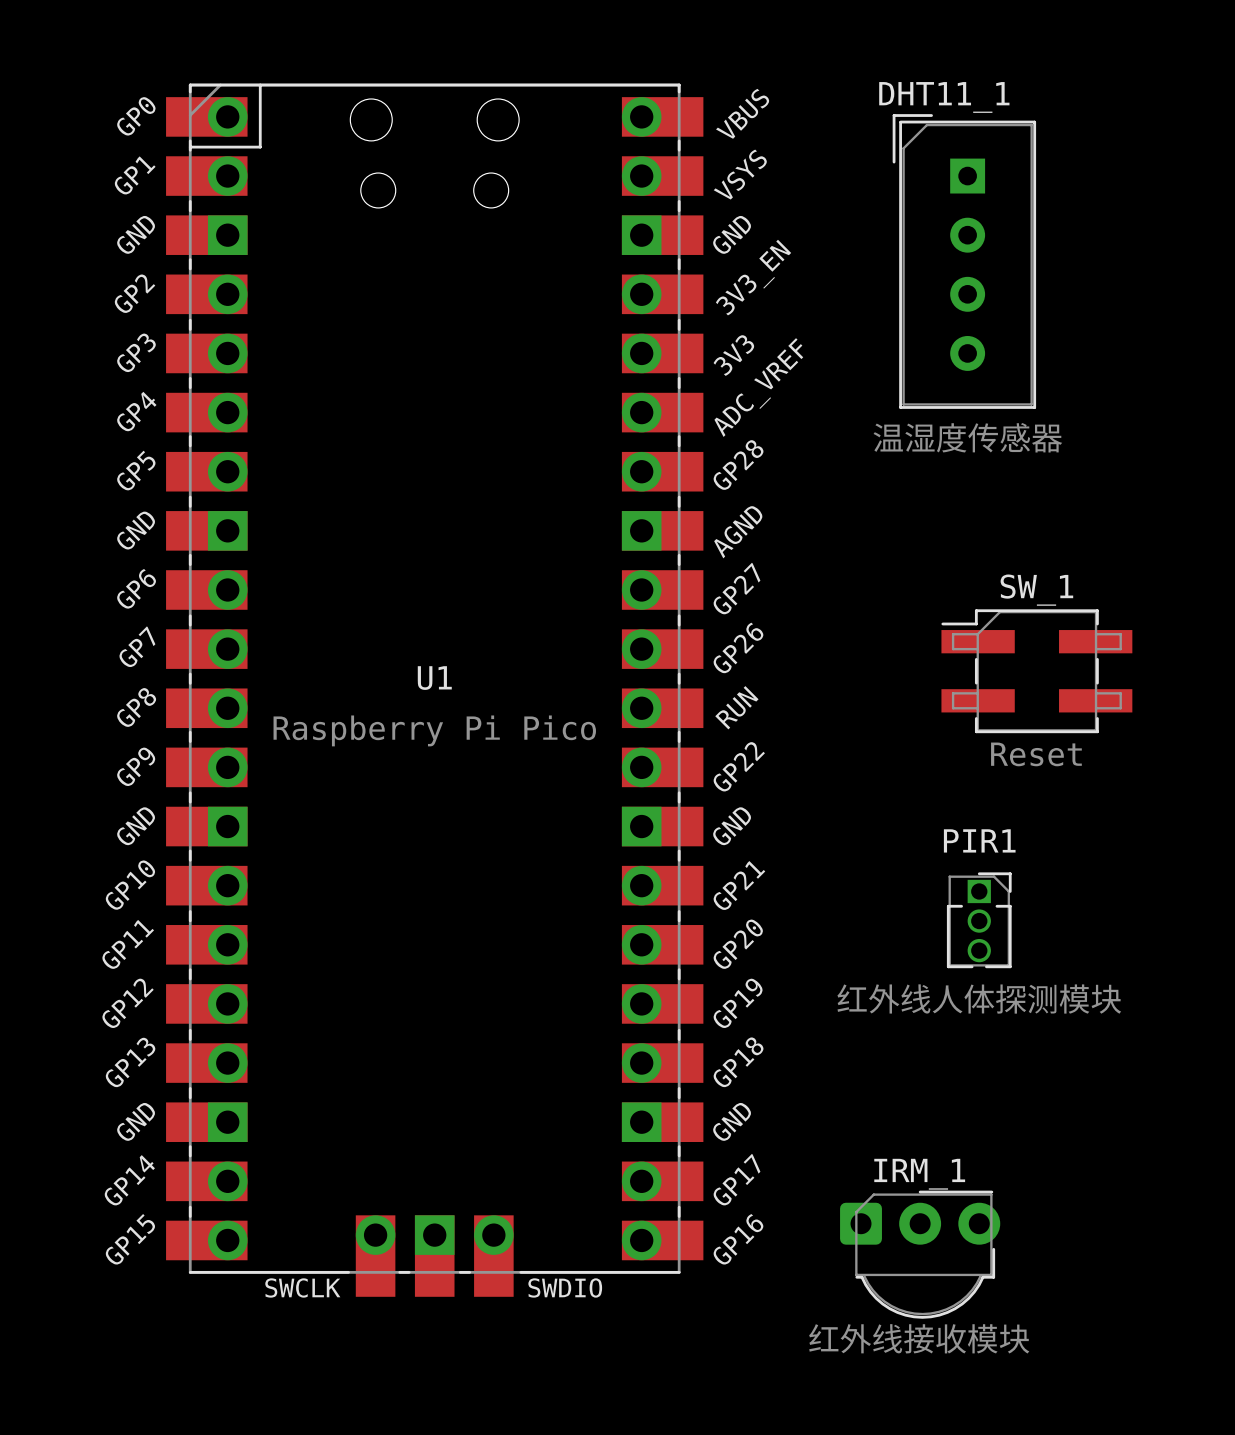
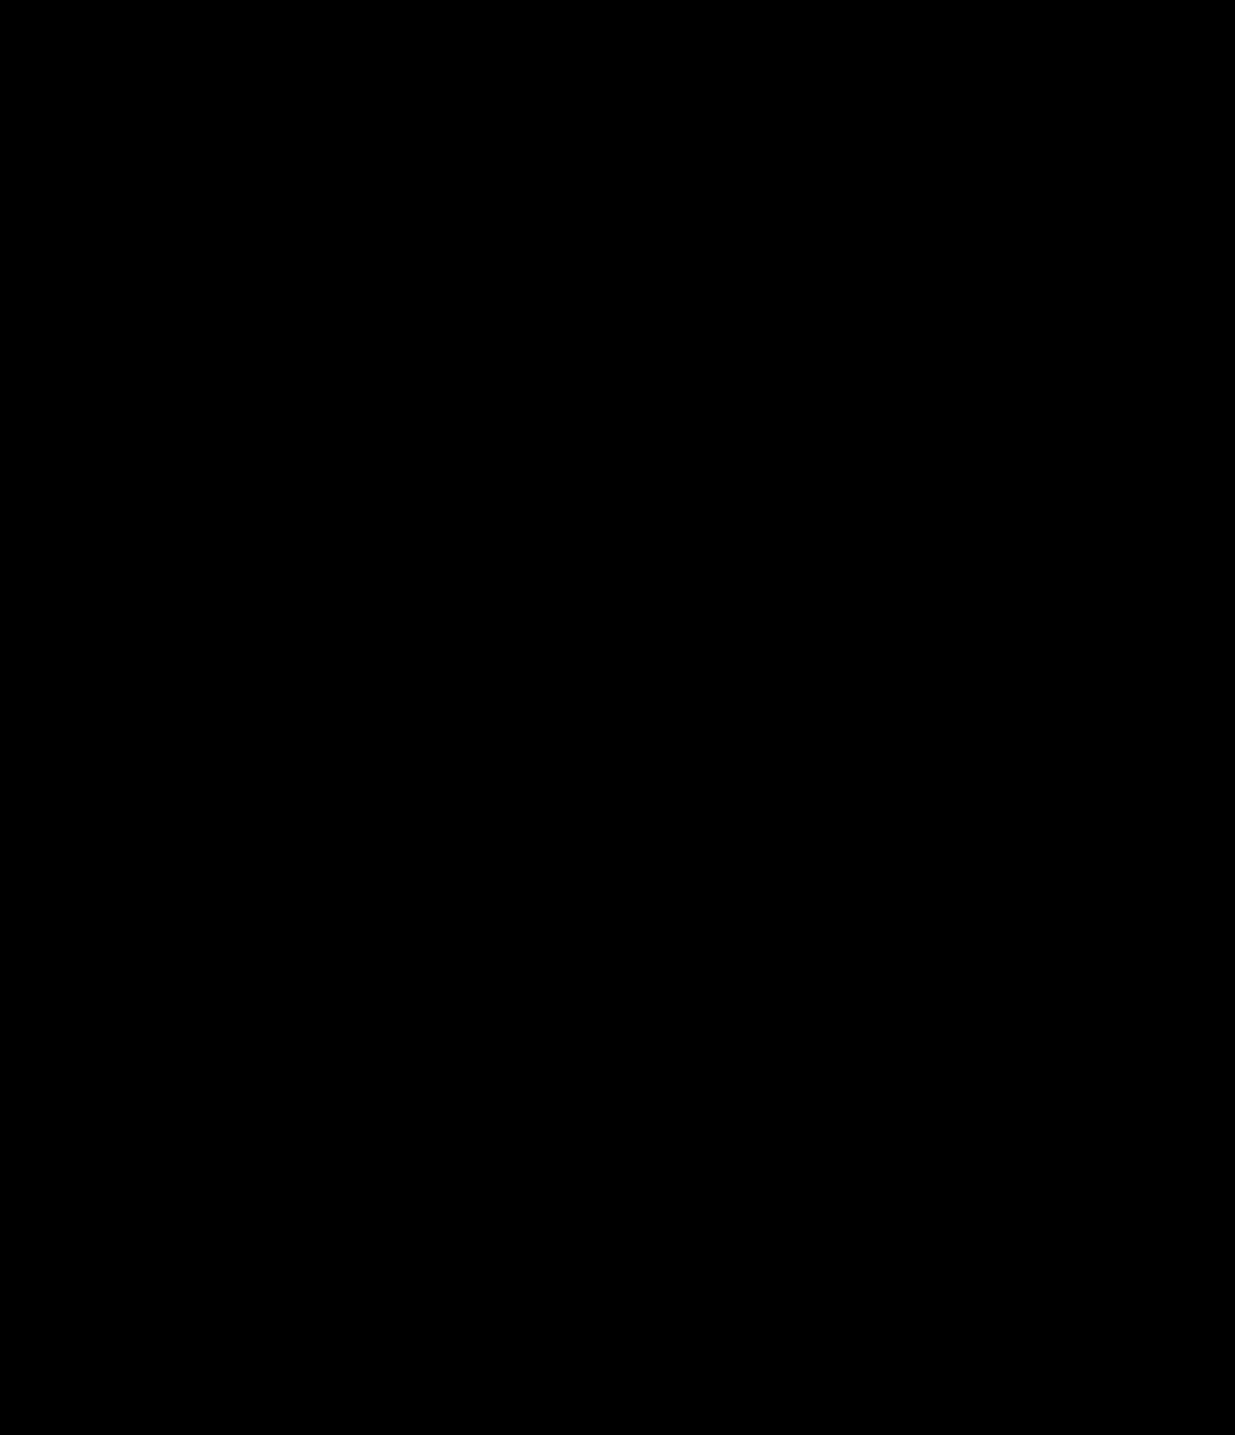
DHT11_1: 温湿度传感器 (964, 261) -> none
SW_1: Reset (1036, 671) -> none
U1: Raspberry Pi Pico (434, 690) -> none
PIR1: 红外线人体探测模块 (979, 920) -> none
IRM_1: 红外线接收模块 (920, 1254) -> none

